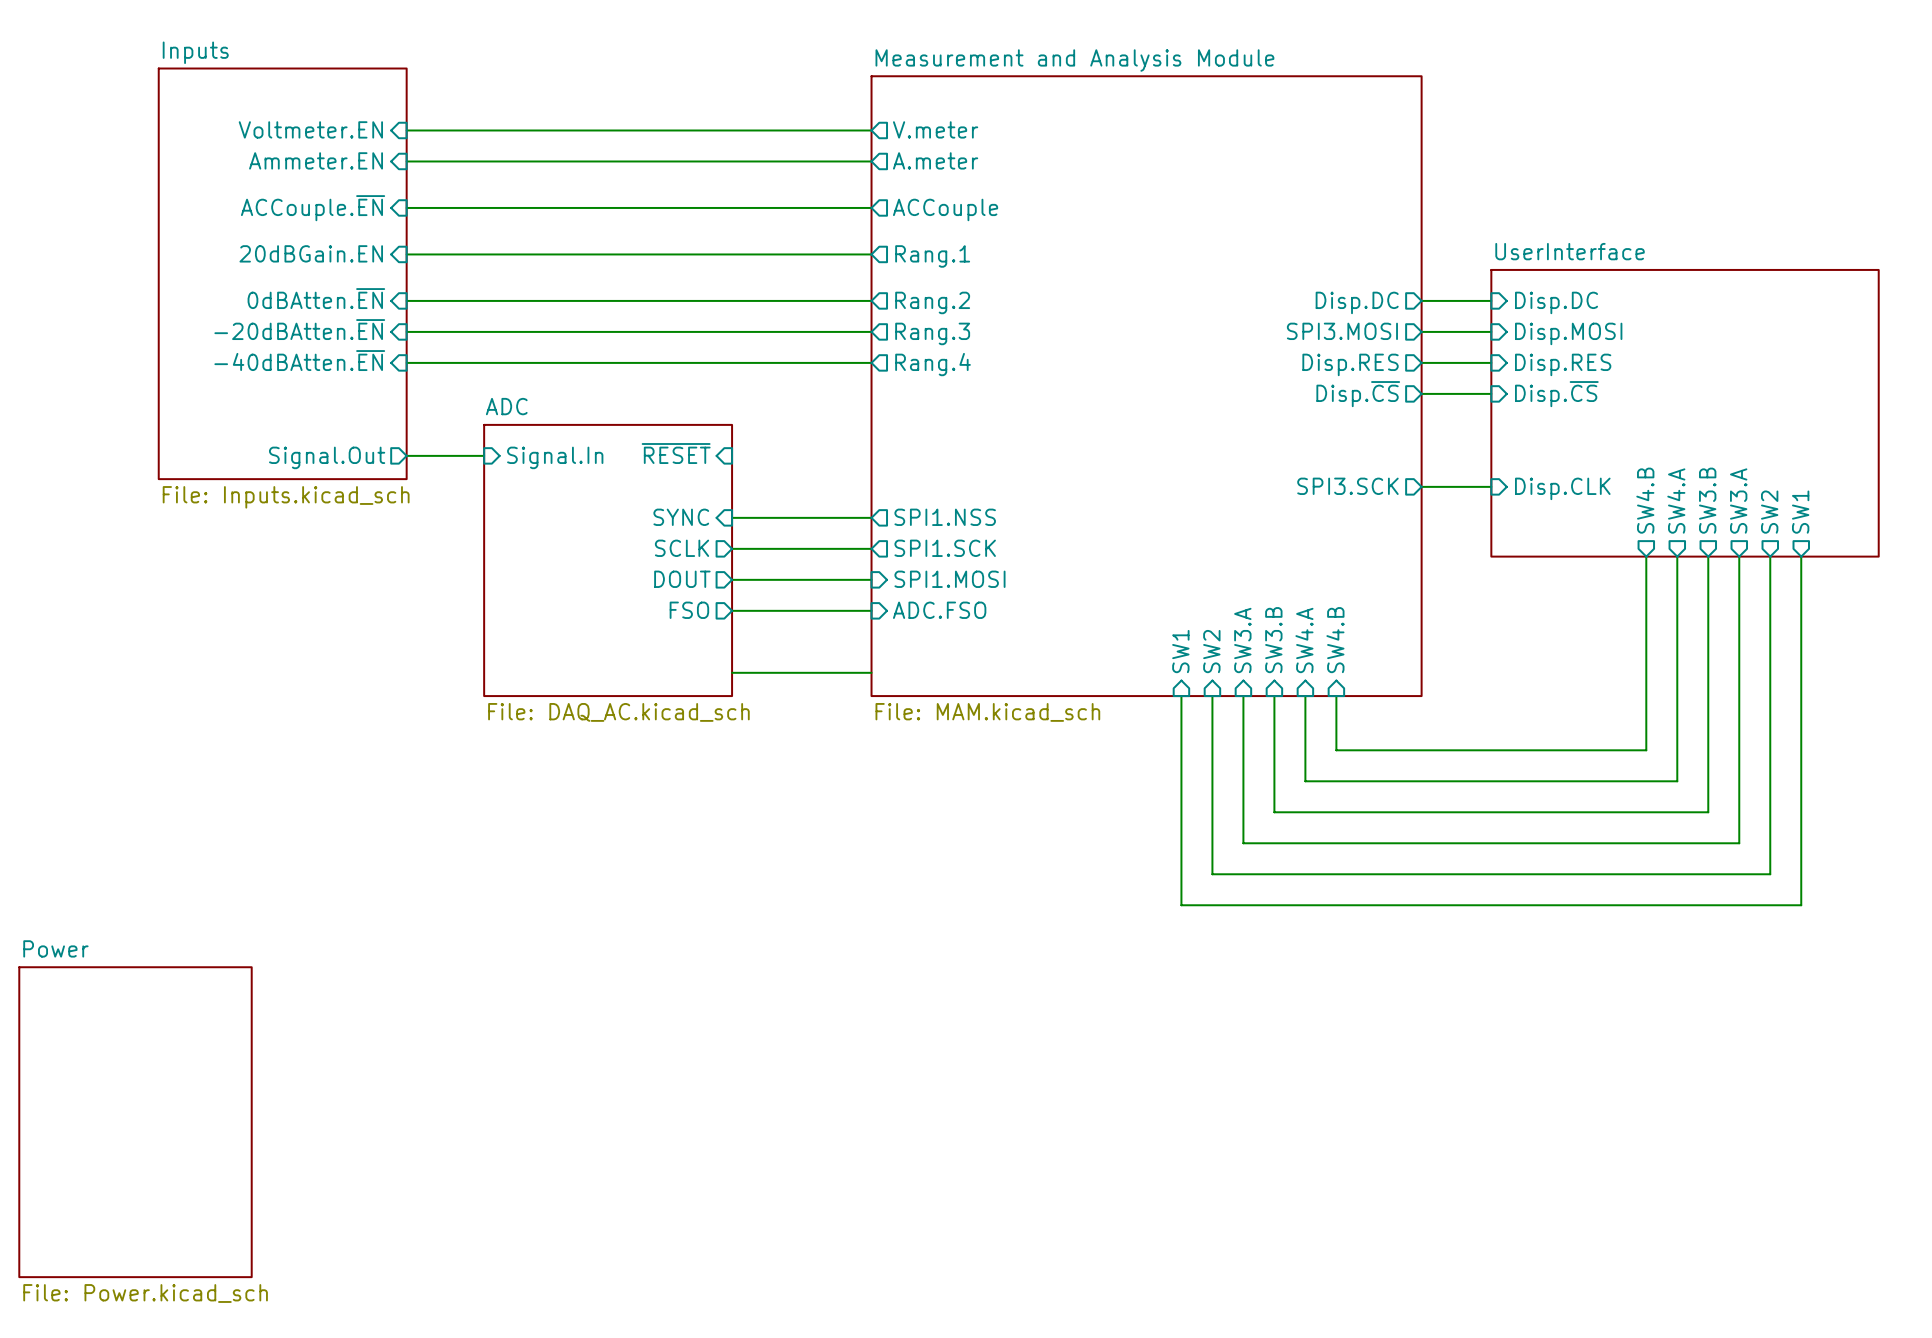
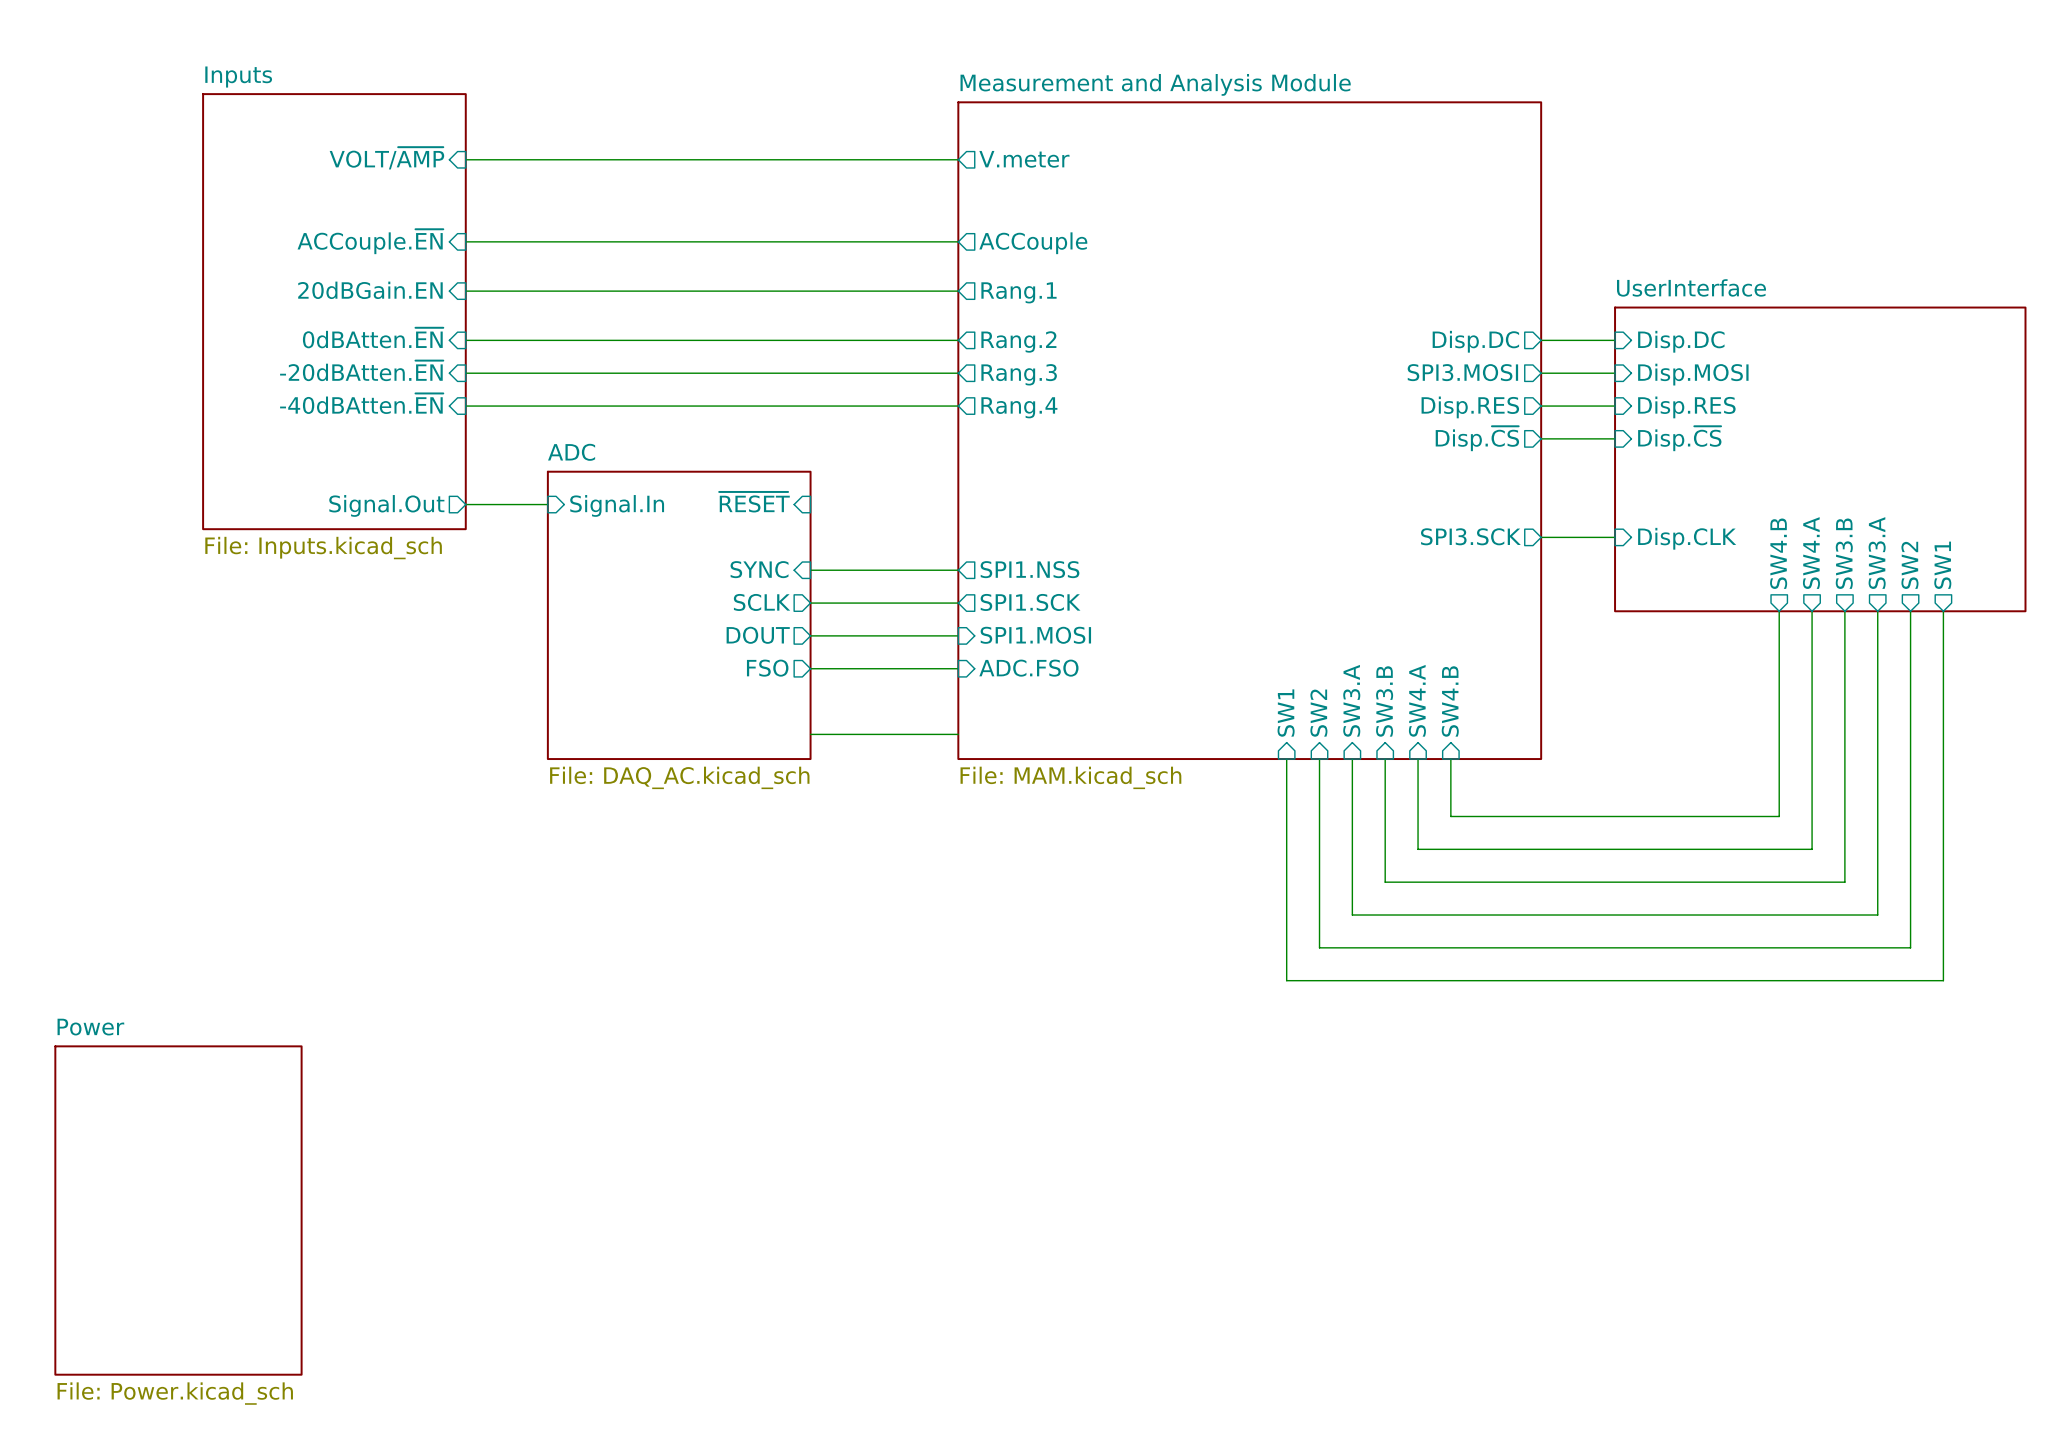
sheet pin: Voltmeter.EN (310, 129) -> VOLT/~{AMP} (386, 158)
sheet pin: Ammeter.EN (316, 160) -> none
sheet pin: A.meter (935, 160) -> none
wire: (406, 161) (871, 161) -> none

